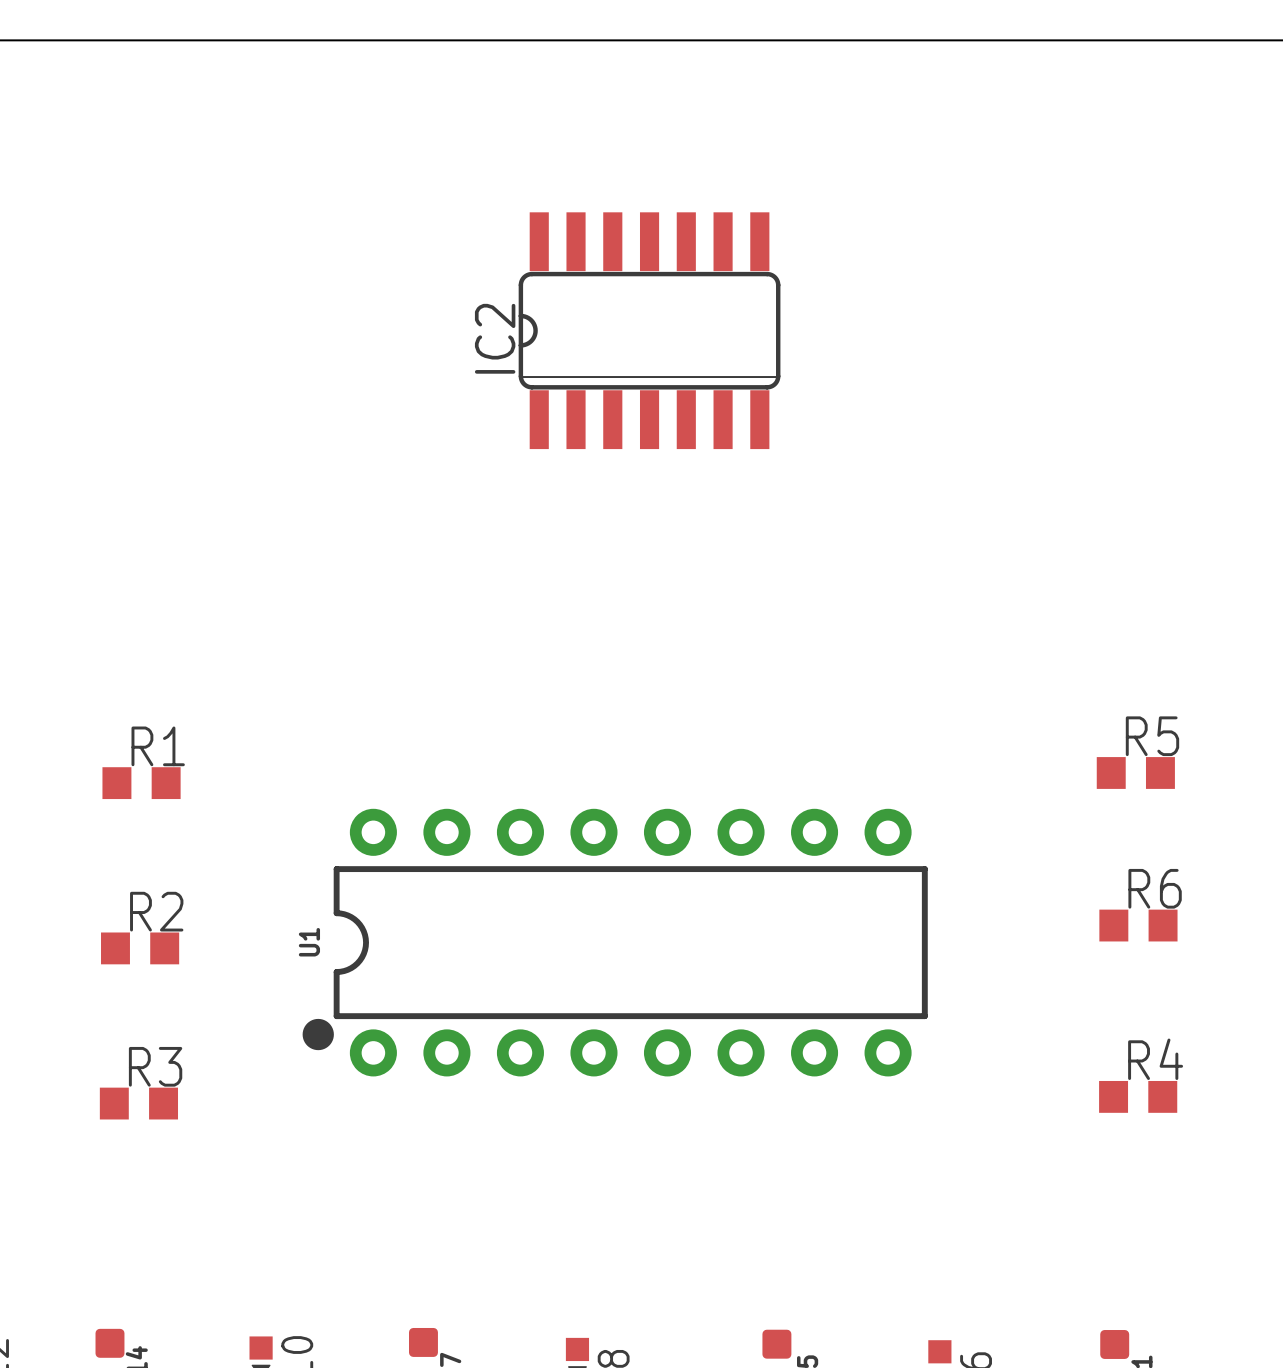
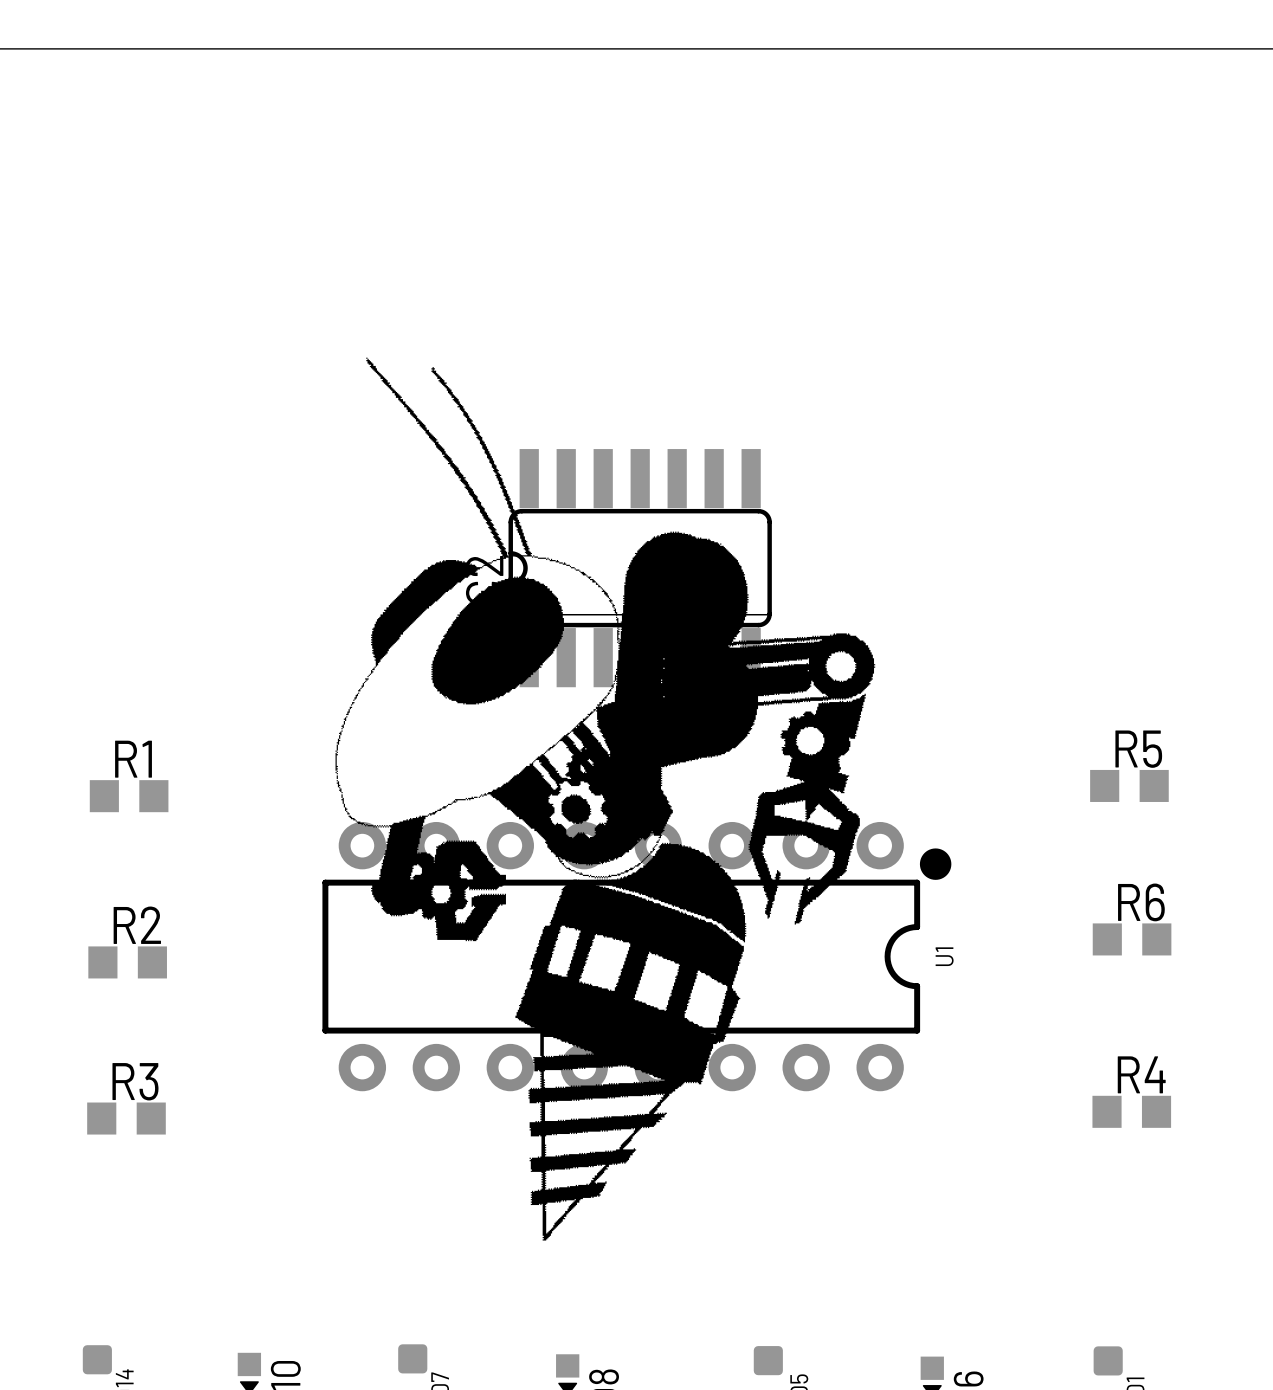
IC2 position: (649, 330) -> (640, 568)
drawing: none -> [335, 357, 876, 1241]
U1 rotation: 0° (615, 942) -> 180° (636, 956)

